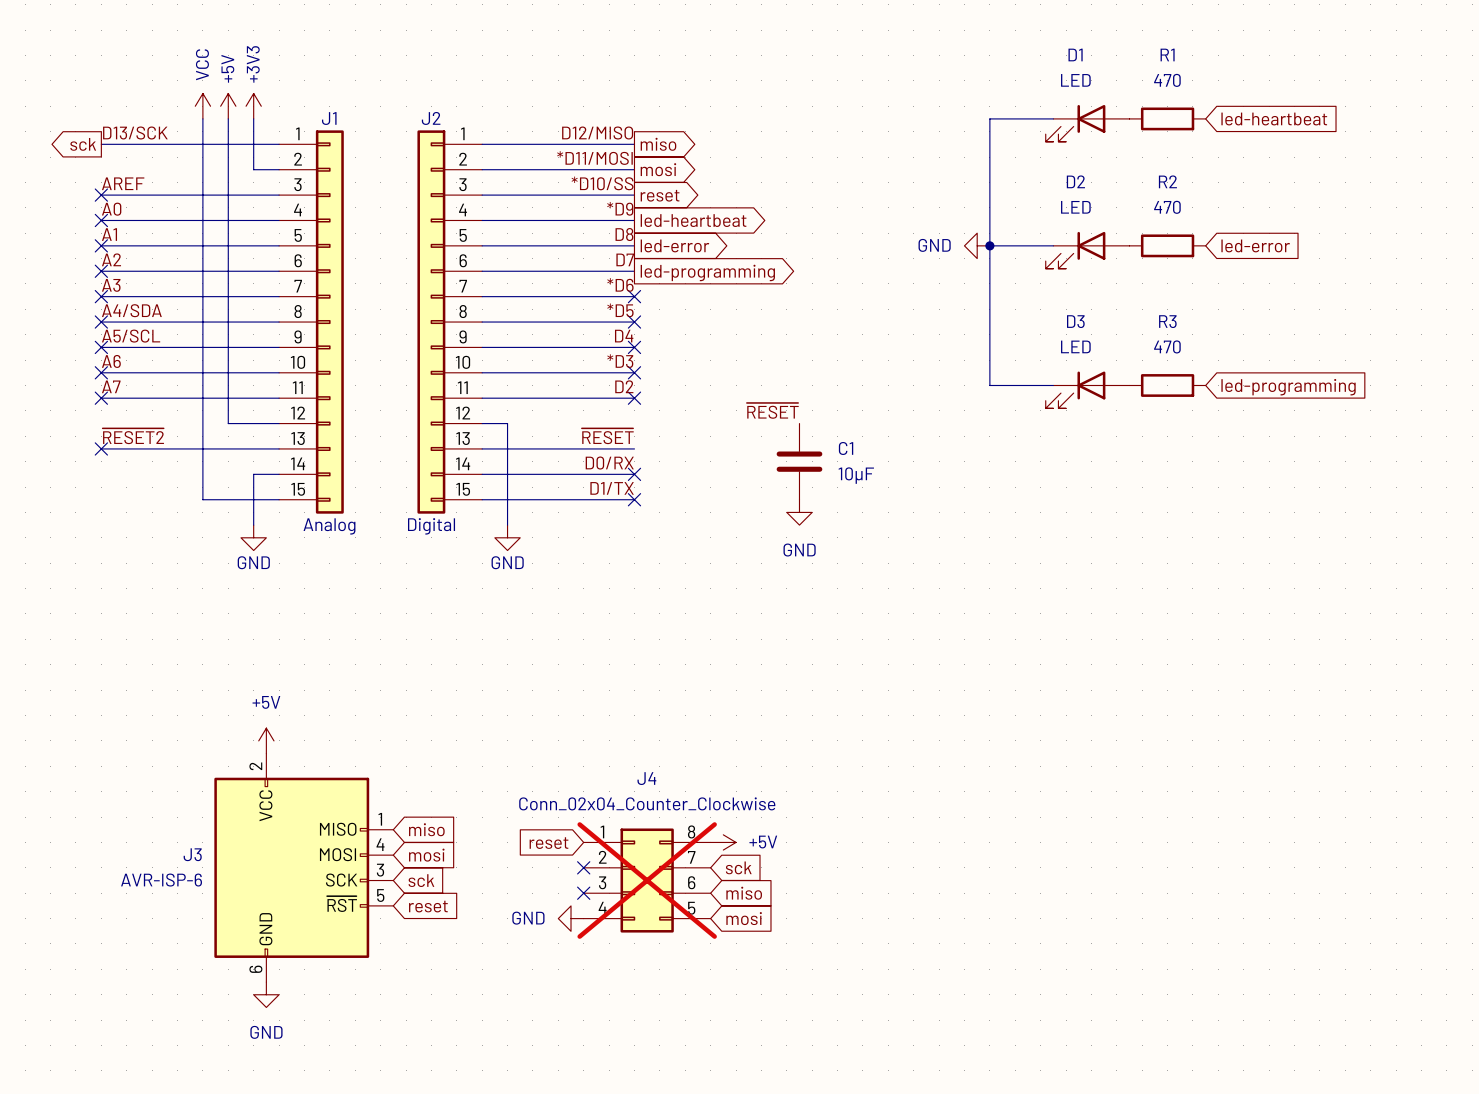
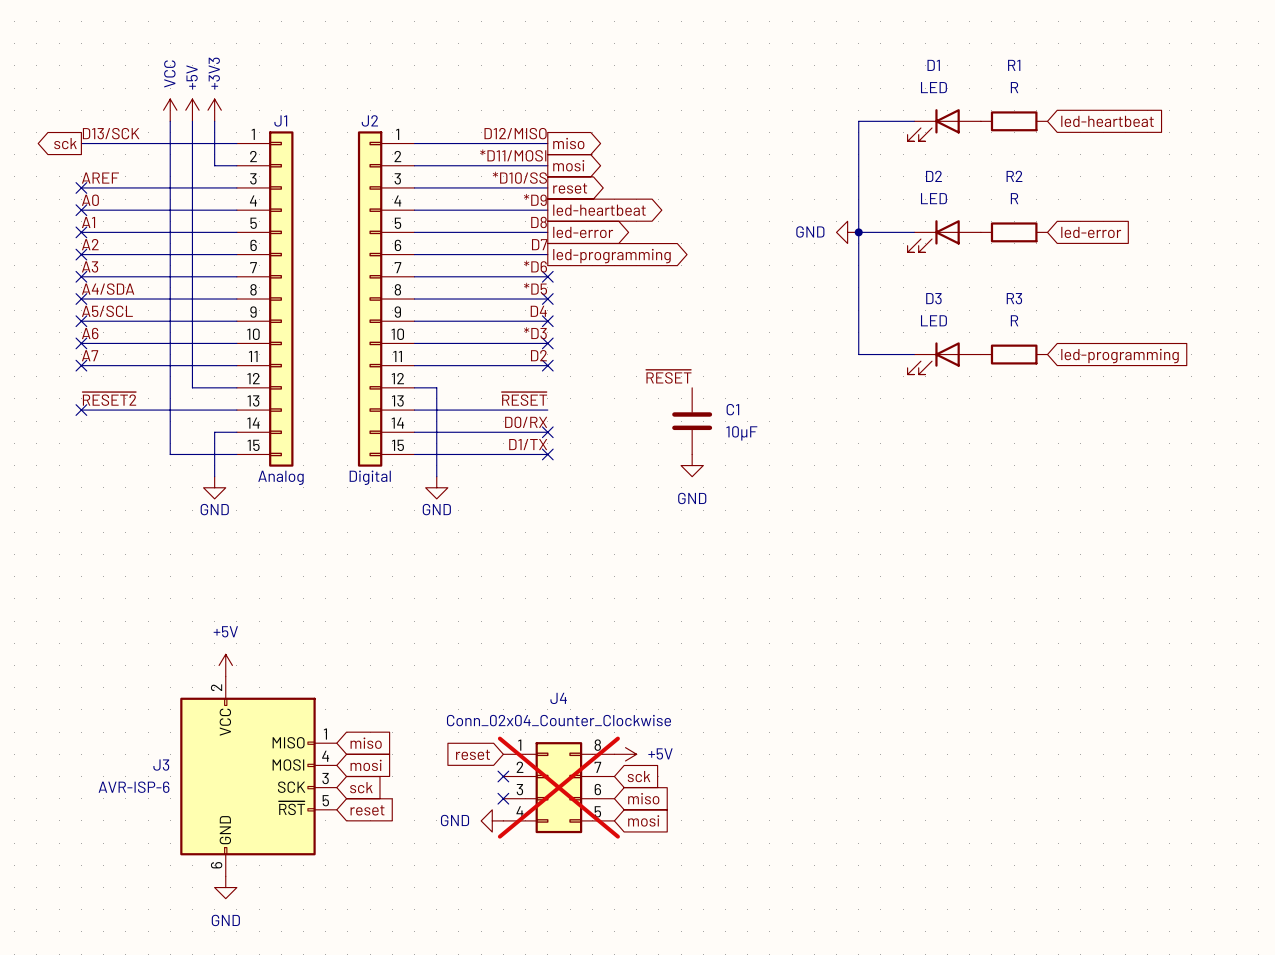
R1 value: 470 (1167, 80) -> R (1014, 87)
R2 value: 470 (1167, 207) -> R (1014, 198)
R3 value: 470 (1167, 346) -> R (1014, 320)

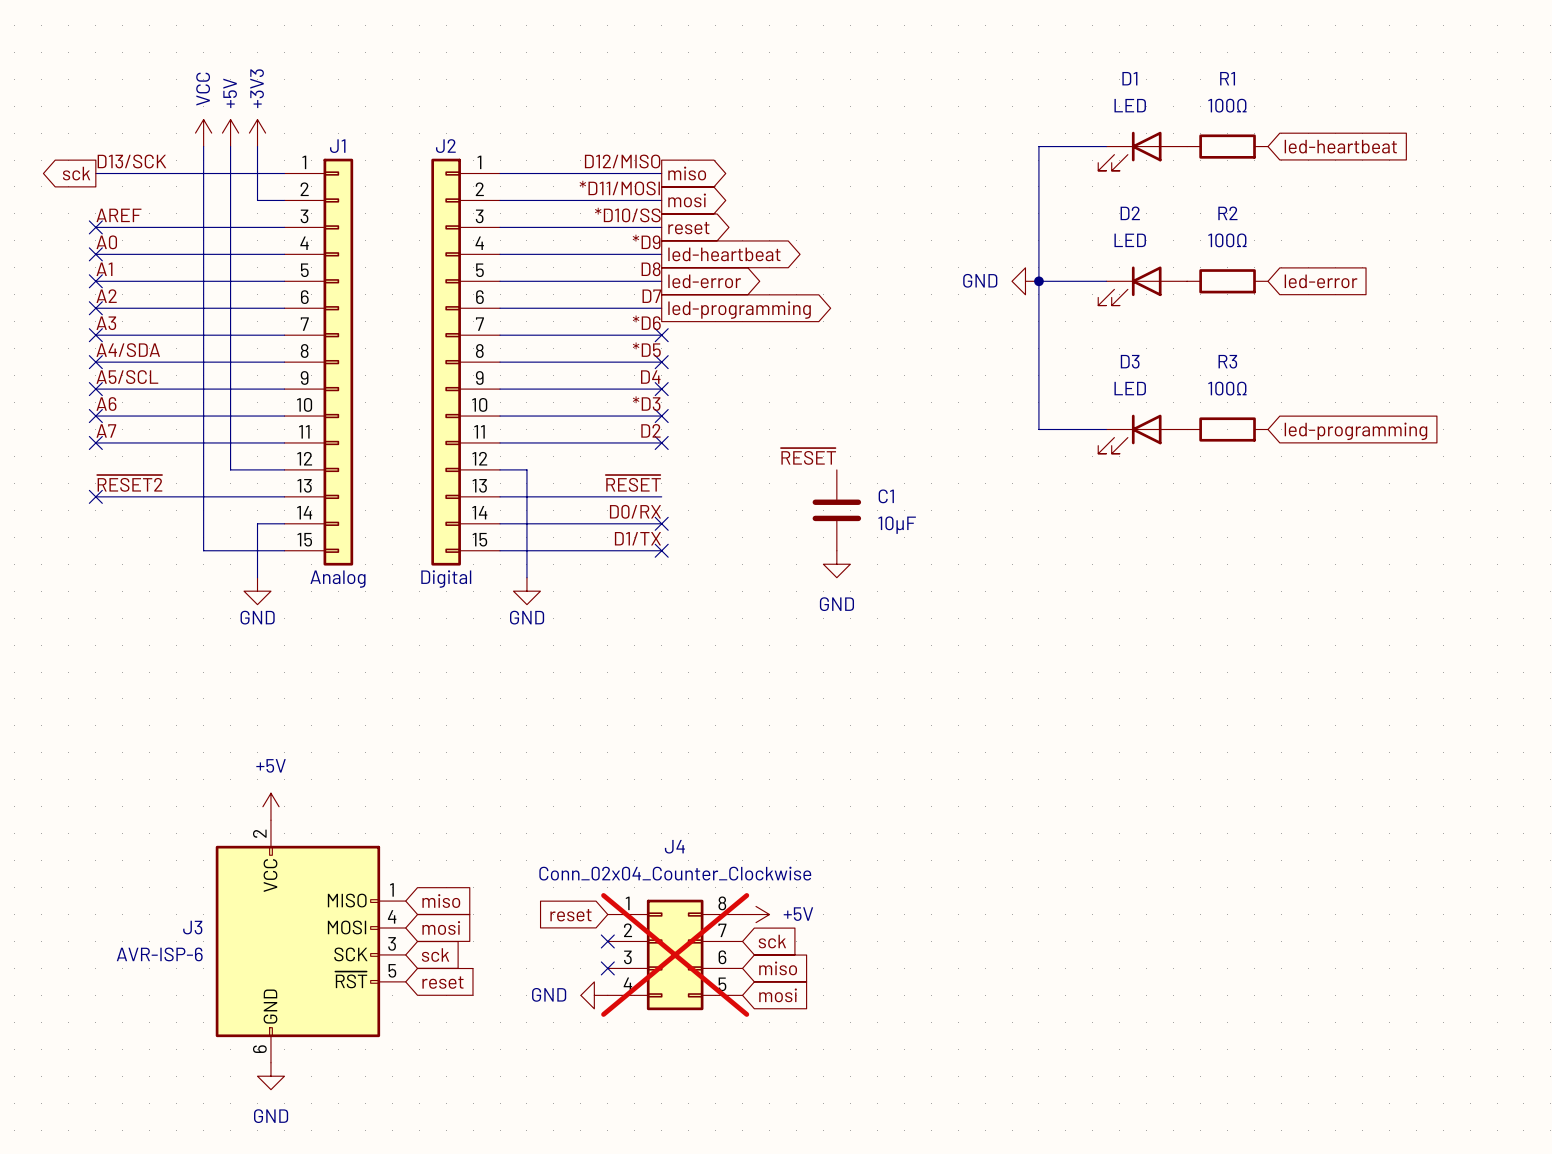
R1 value: R (1014, 87) -> 100Ω (1227, 105)
R2 value: R (1014, 198) -> 100Ω (1227, 240)
R3 value: R (1014, 320) -> 100Ω (1227, 388)

